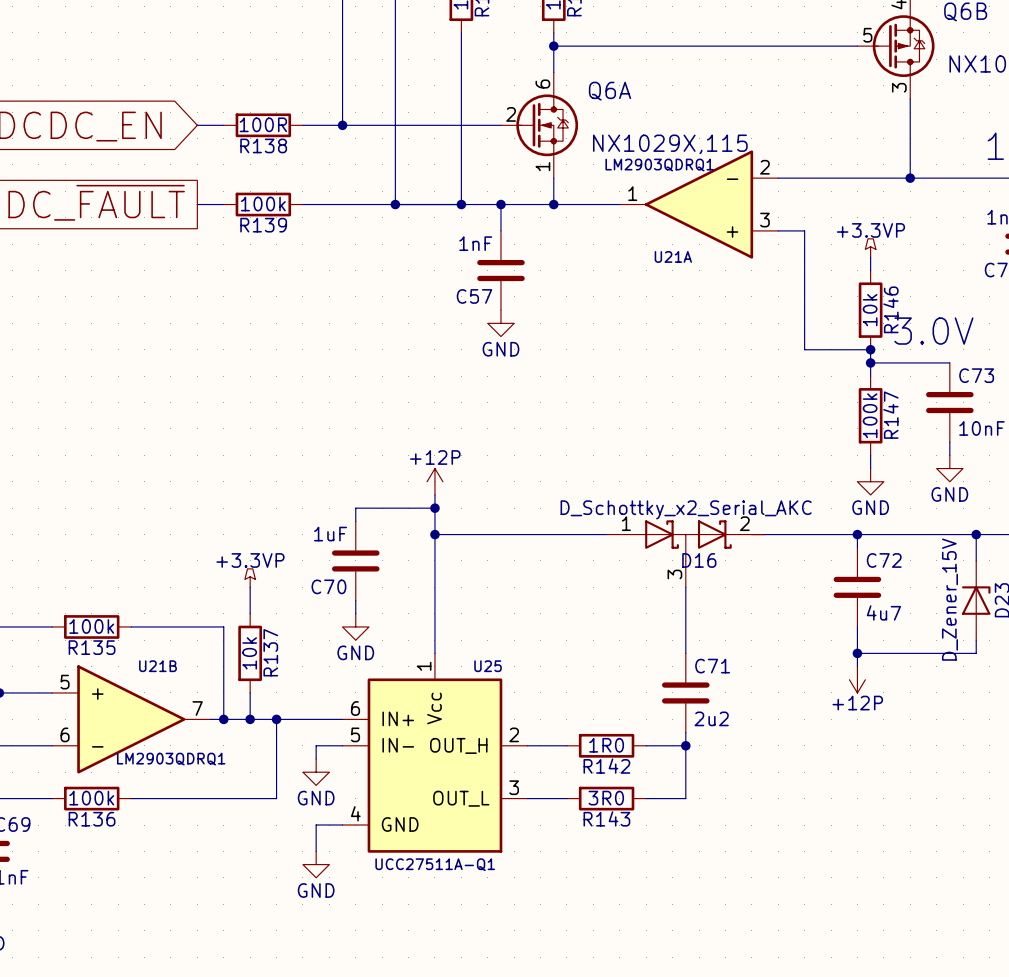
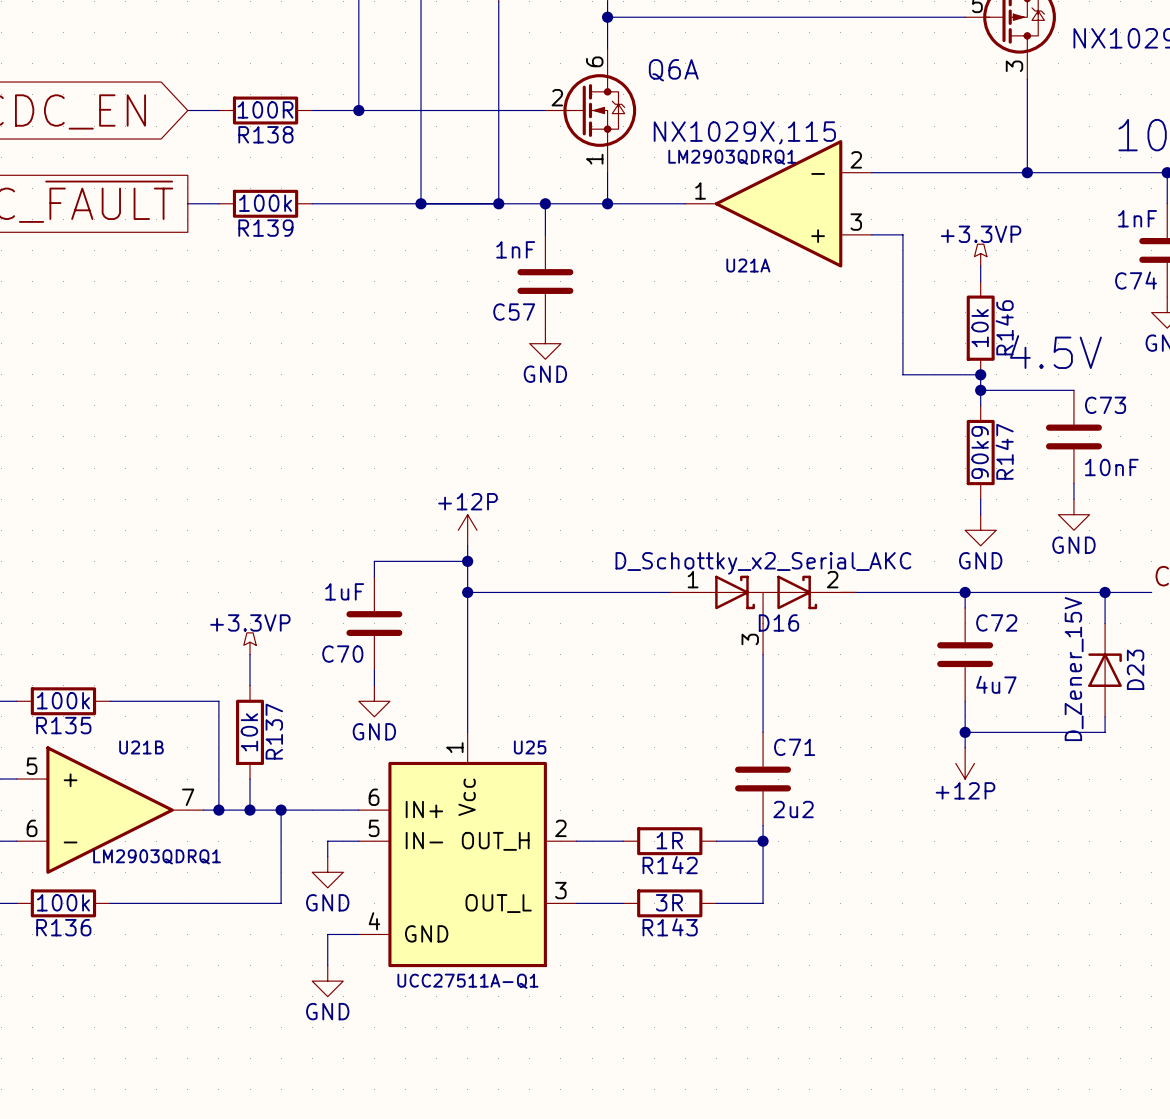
text: 3.0V (933, 331) -> 4.5V (1055, 352)
R147 value: 100k (870, 415) -> 90k9 (980, 452)
R142 value: 1R0 (606, 745) -> 1R (669, 840)
R143 value: 3R0 (606, 798) -> 3R (669, 902)

